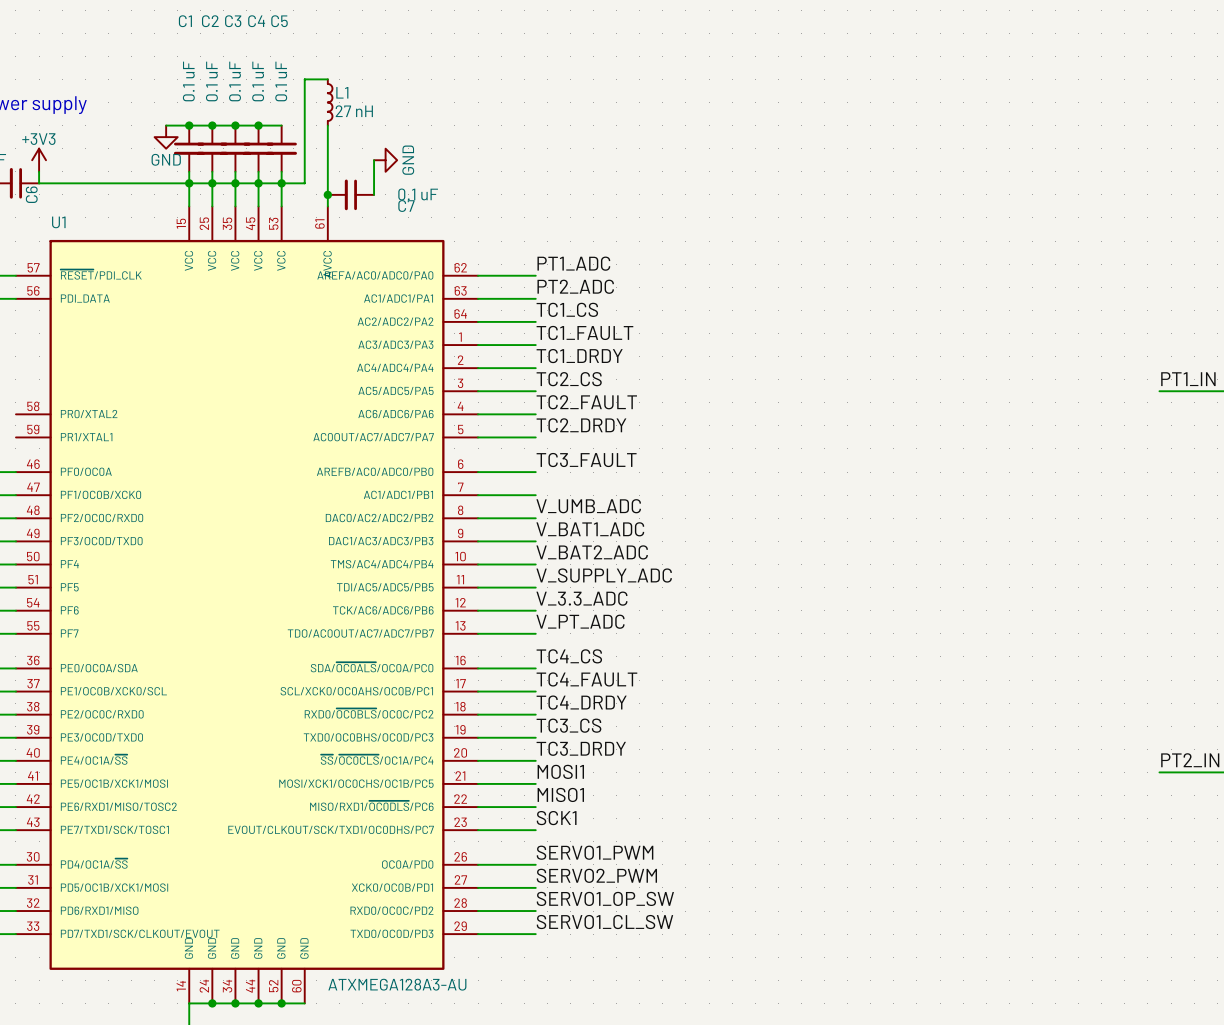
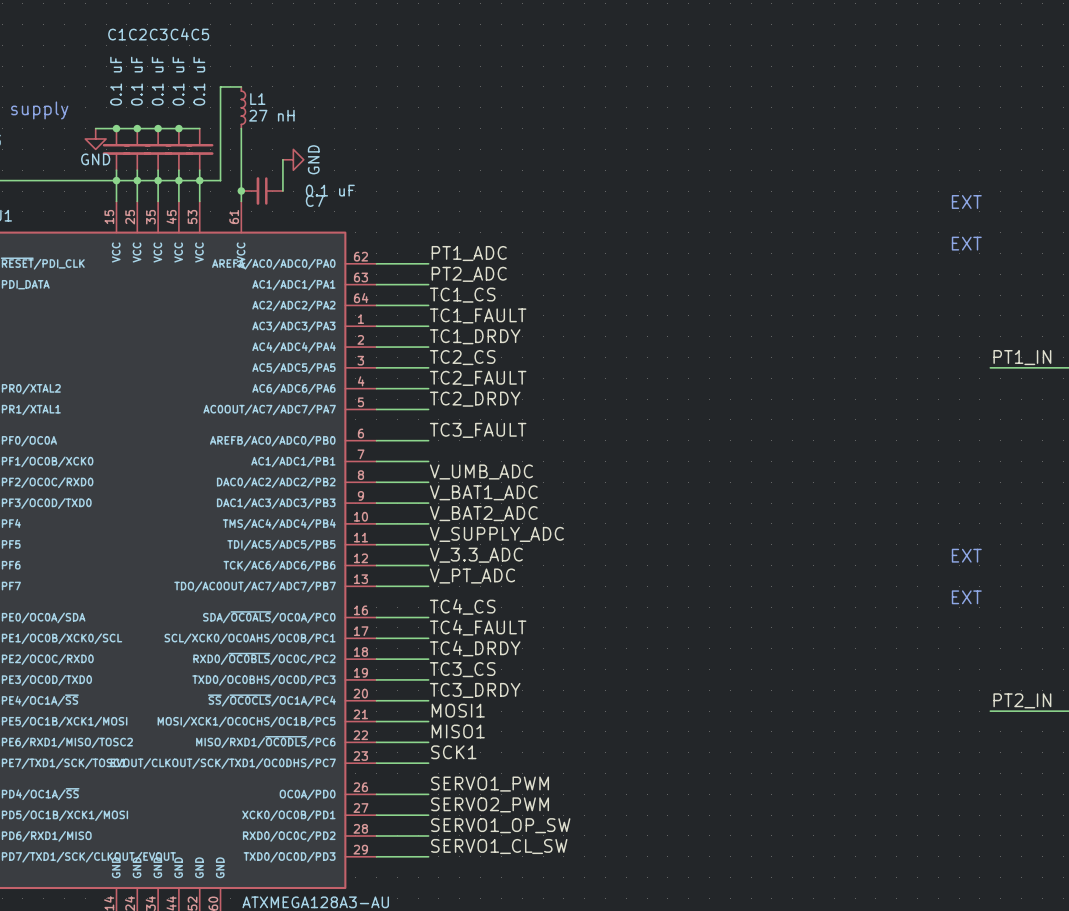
text: none -> EXT (966, 201)
text: none -> EXT (966, 243)
text: none -> EXT (966, 555)
text: none -> EXT (966, 597)

